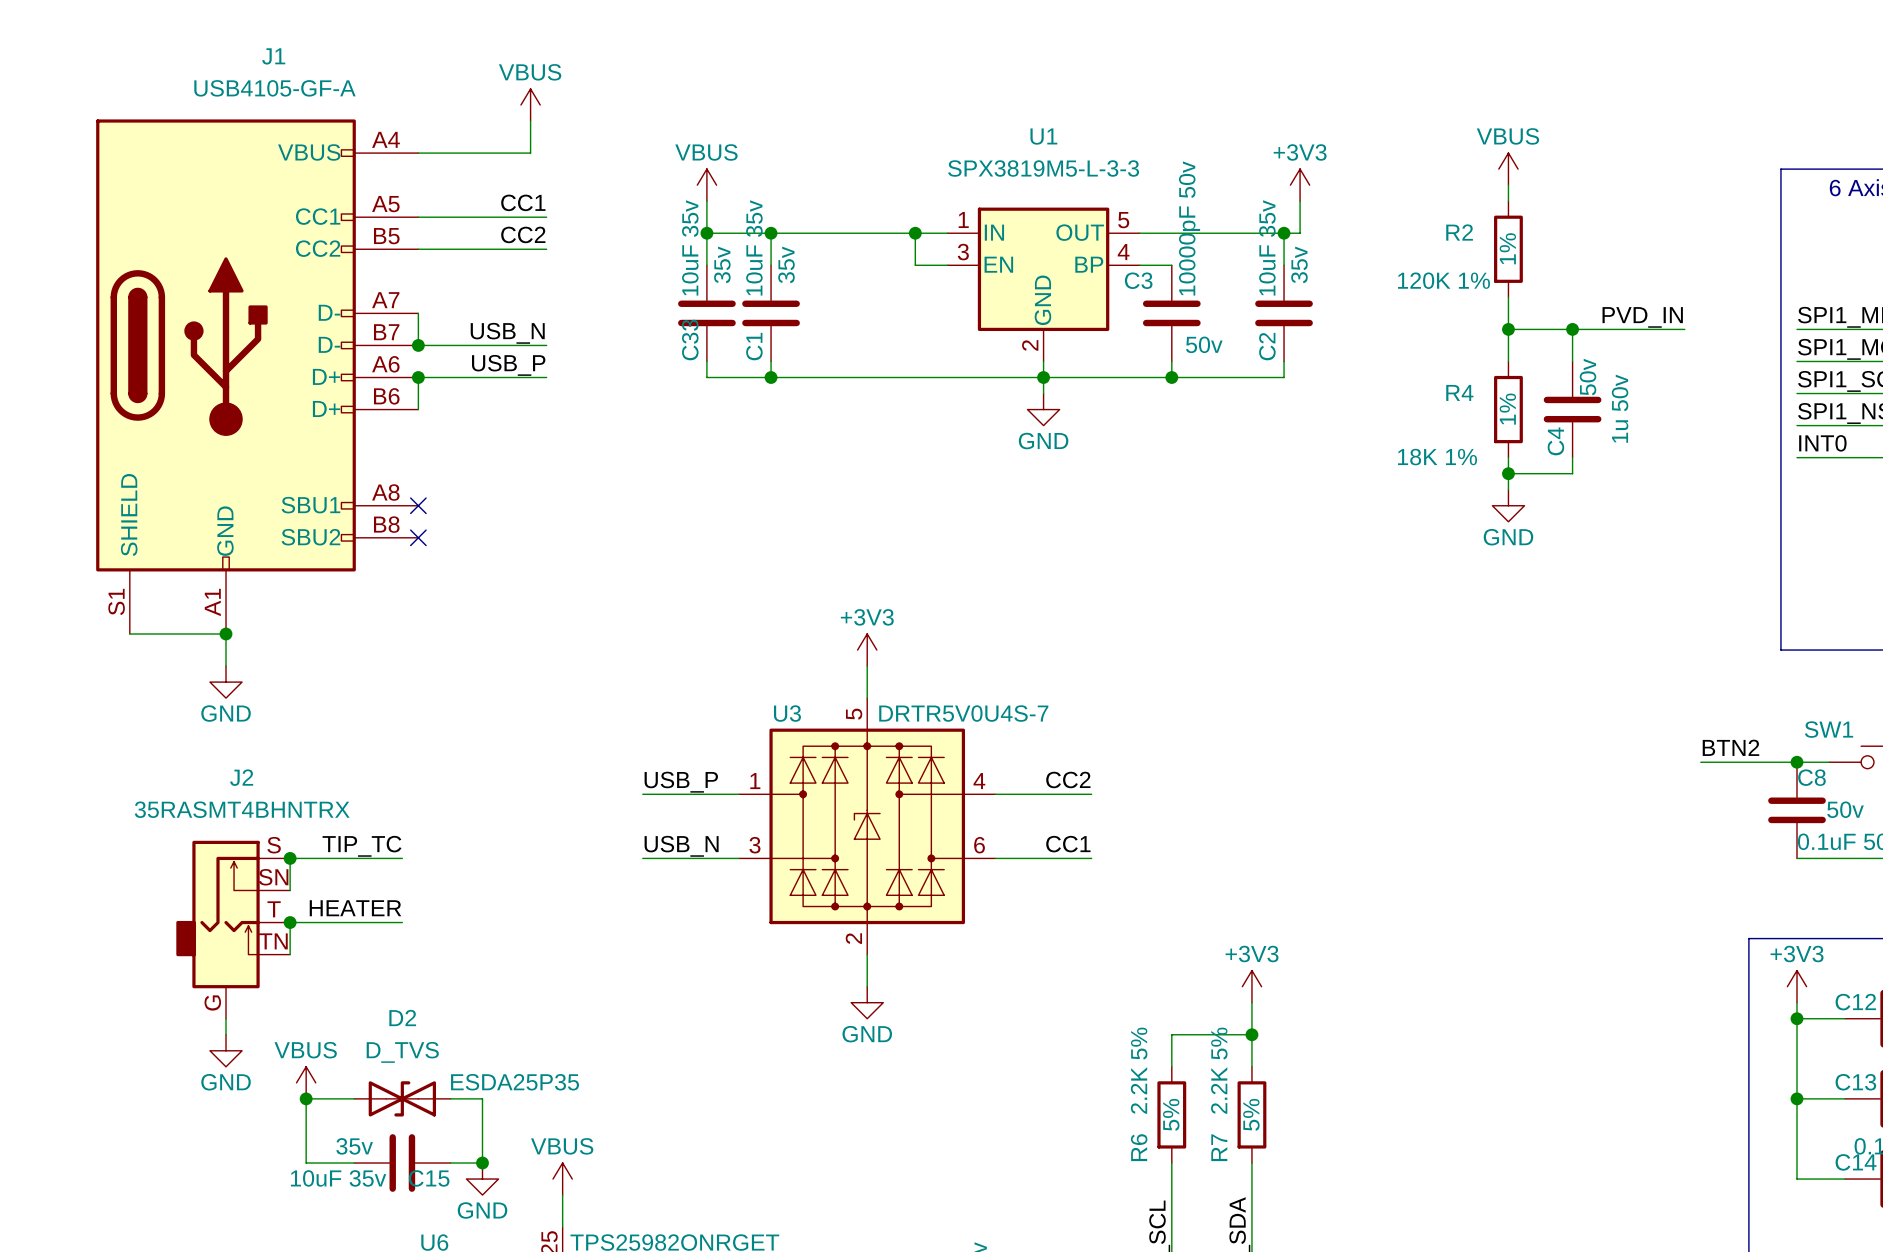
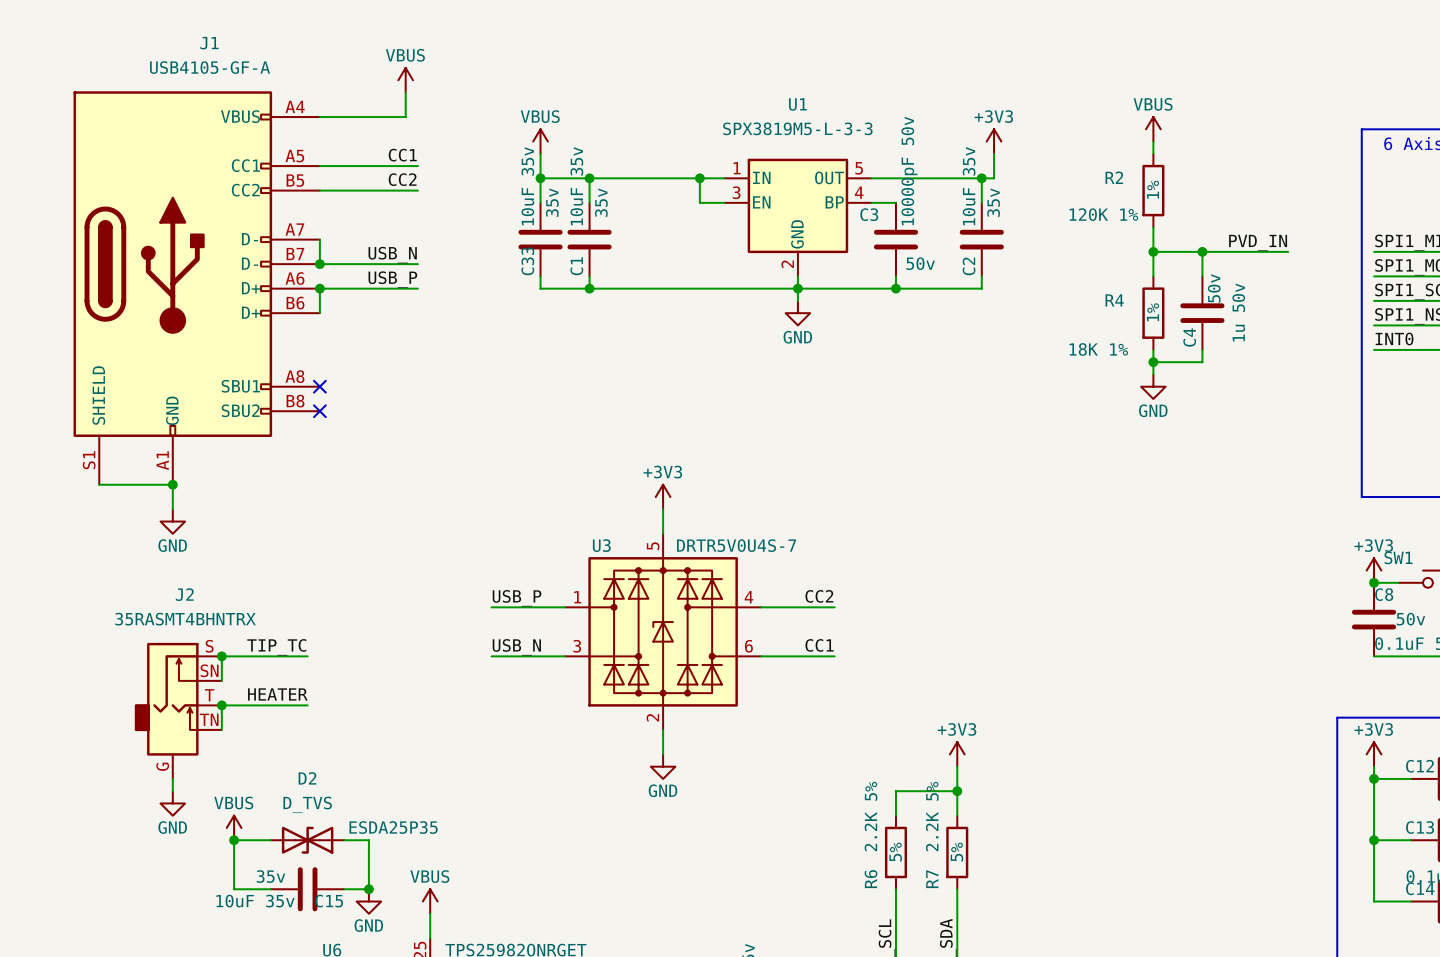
power symbol: none -> +3V3 (1374, 570)
label: BTN2 (1730, 747) -> none
wire: (1700, 762) (1797, 762) -> none

